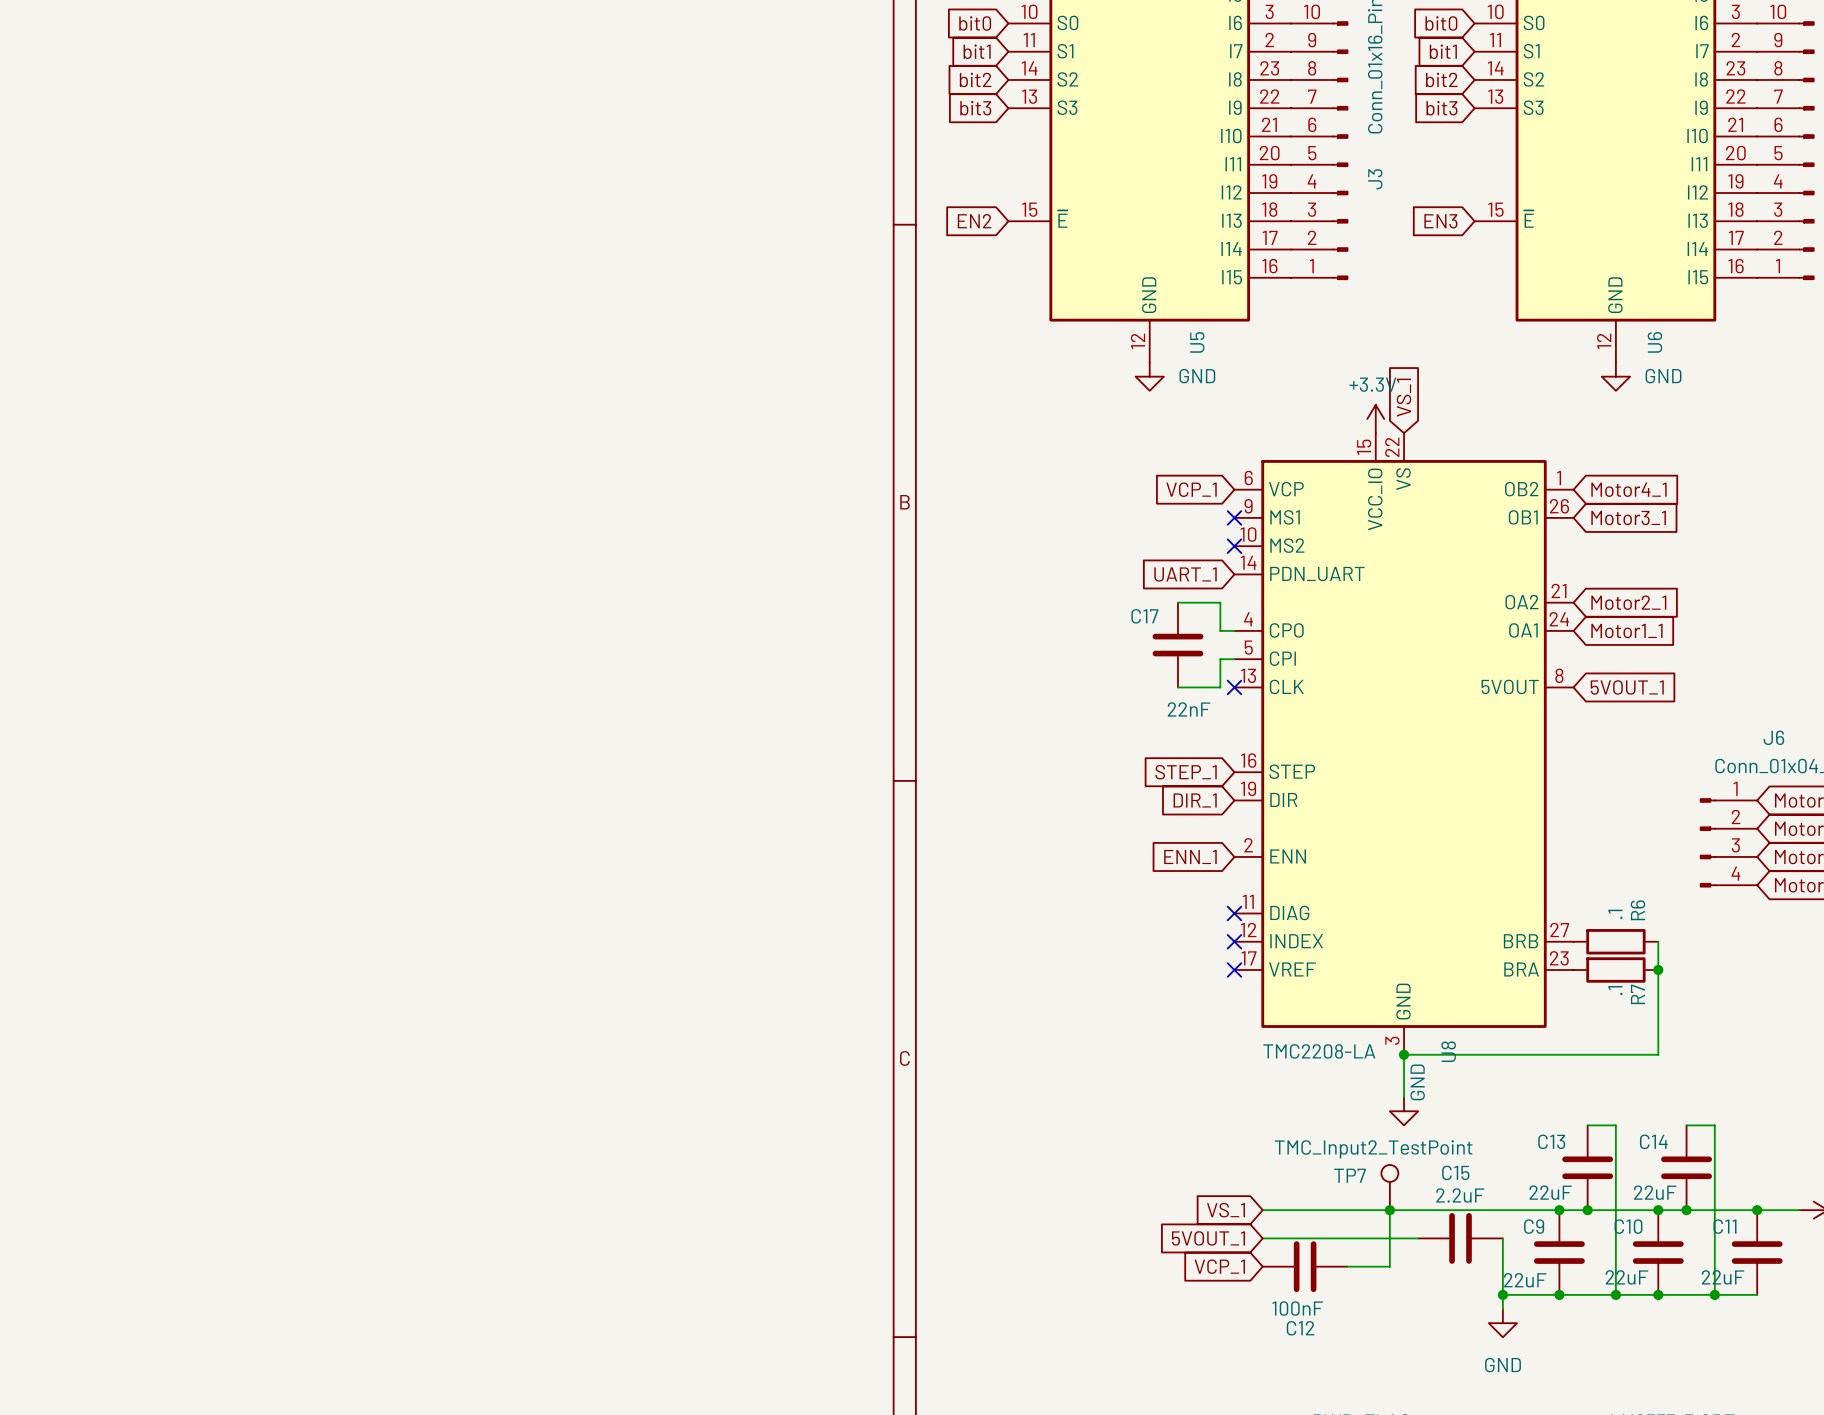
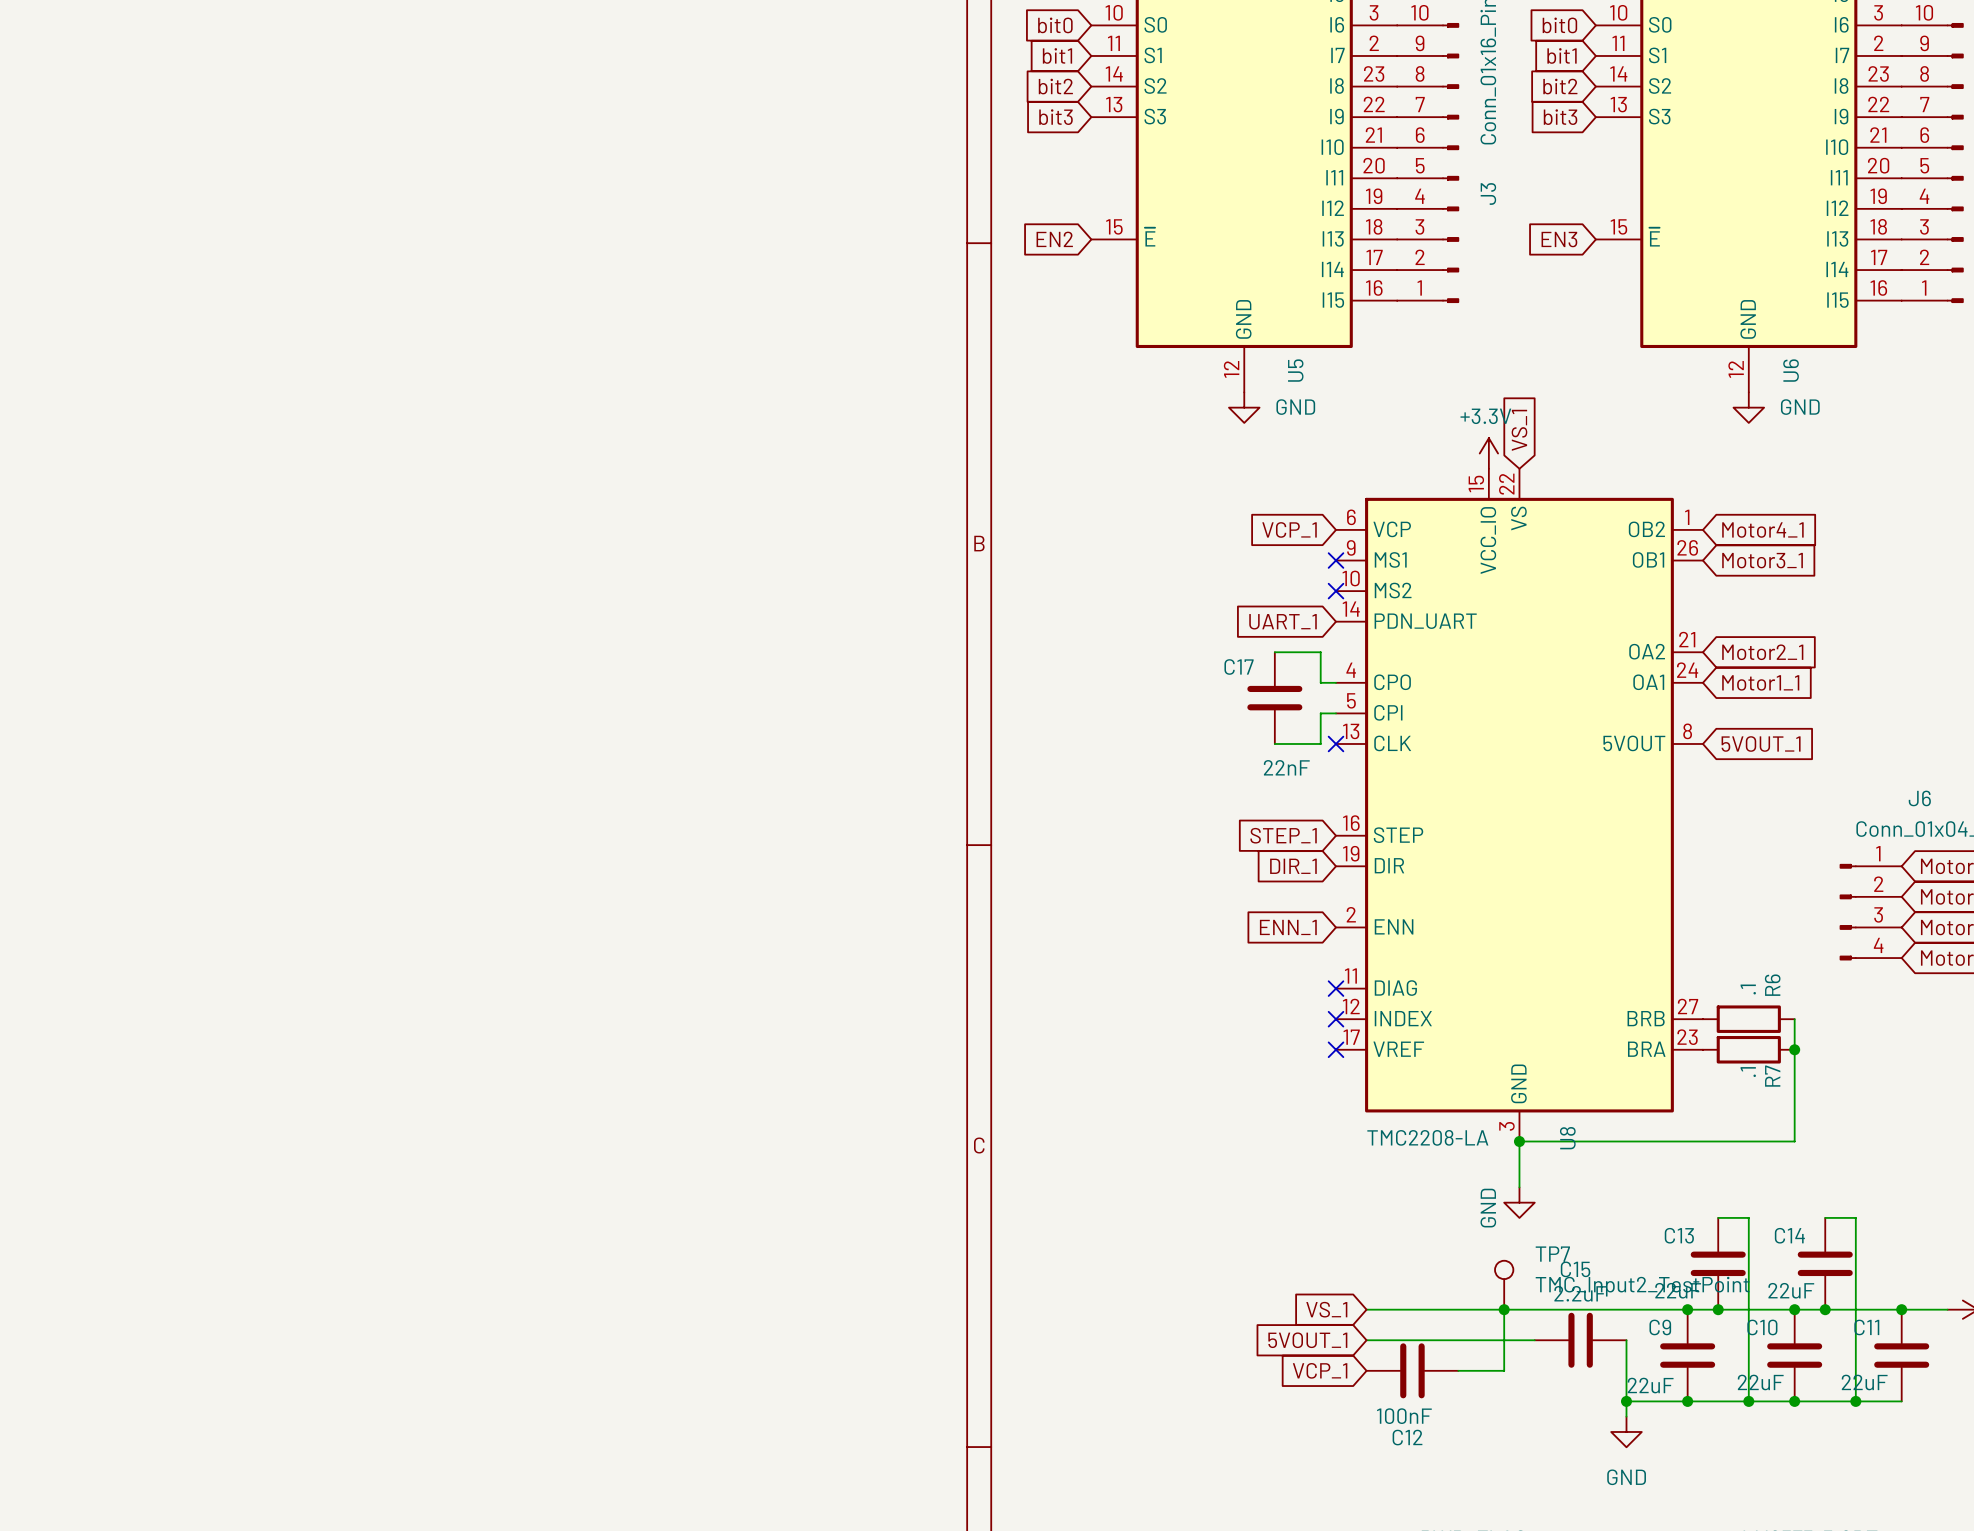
power symbol text position: GND (1417, 1082) -> GND (1488, 1208)
TP7 value position: TMC_Input2_TestPoint (1373, 1149) -> TMC_Input2_TestPoint (1642, 1286)
TP7 name position: TP7 (1350, 1175) -> TP7 (1552, 1254)

